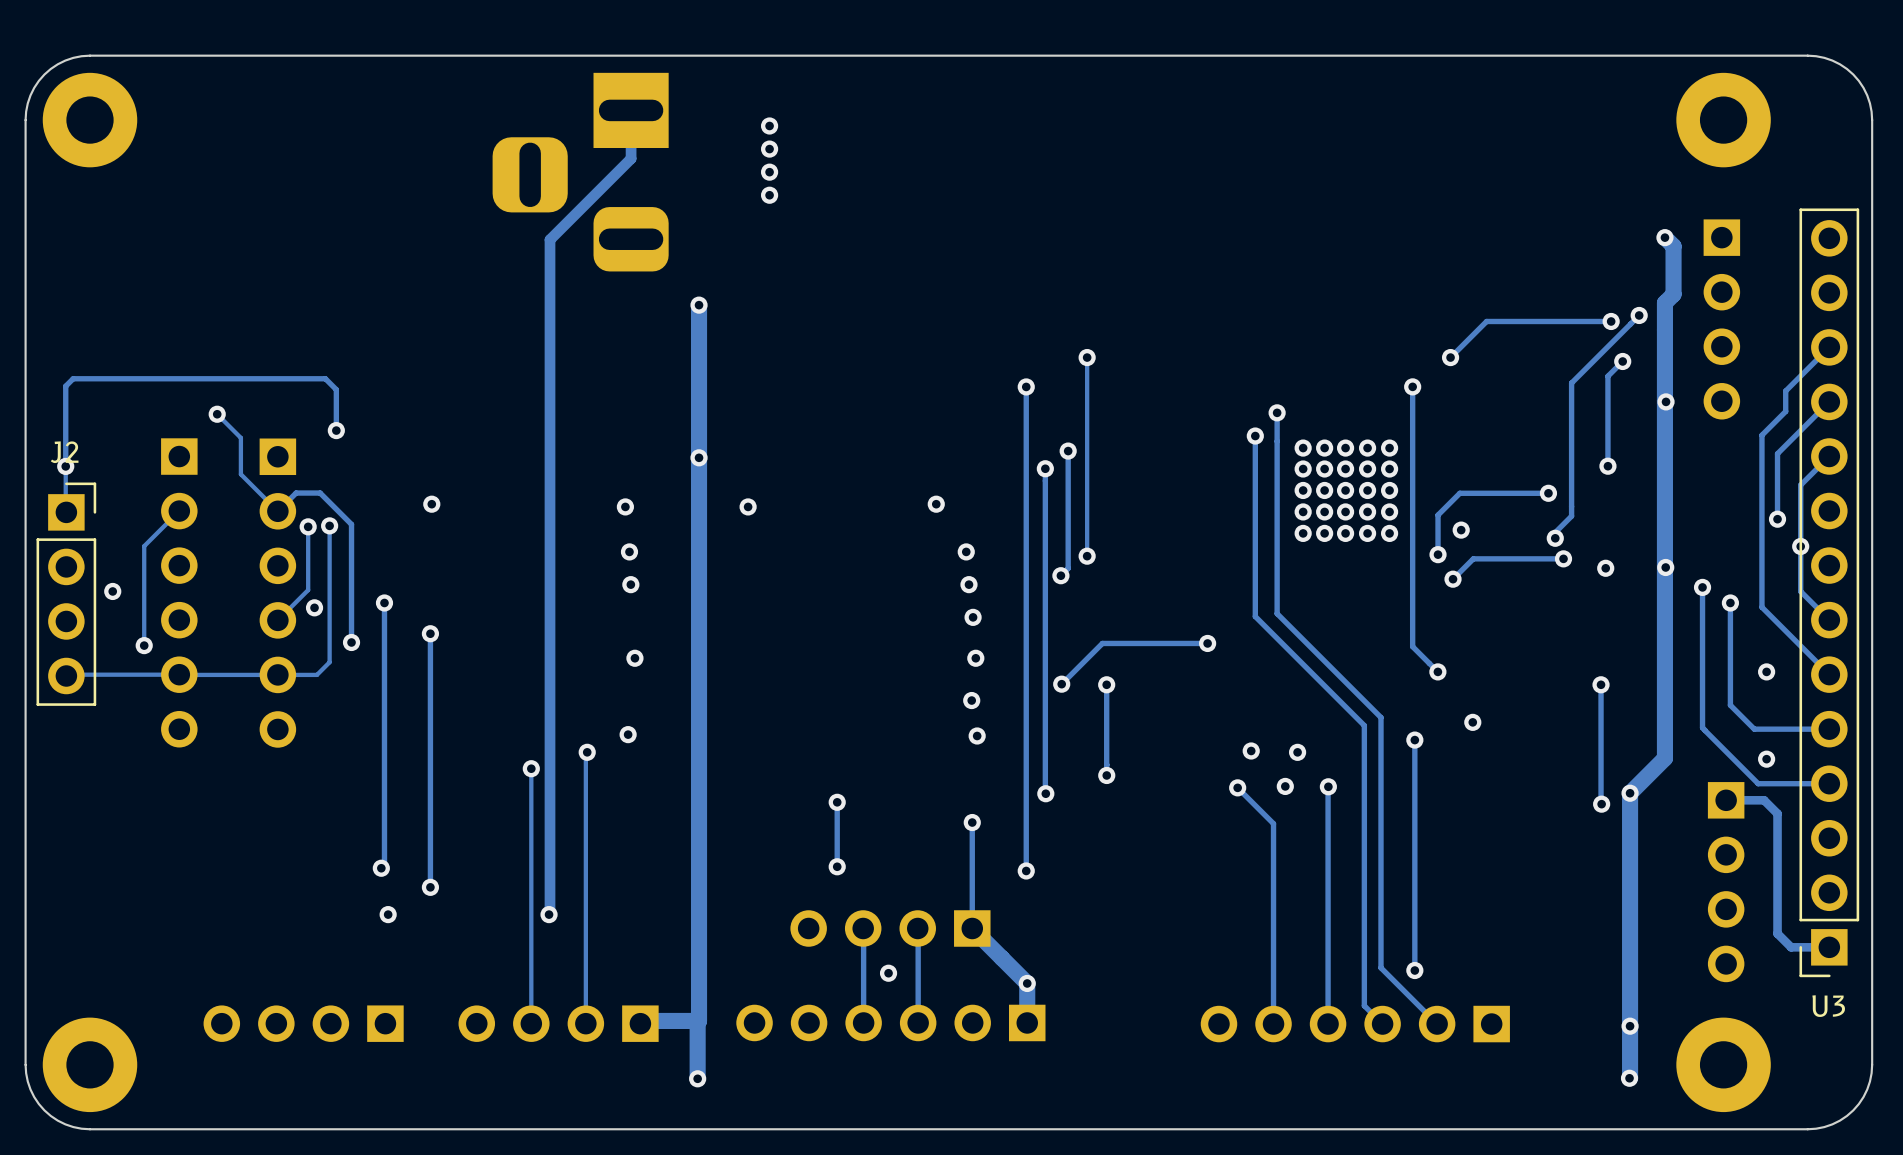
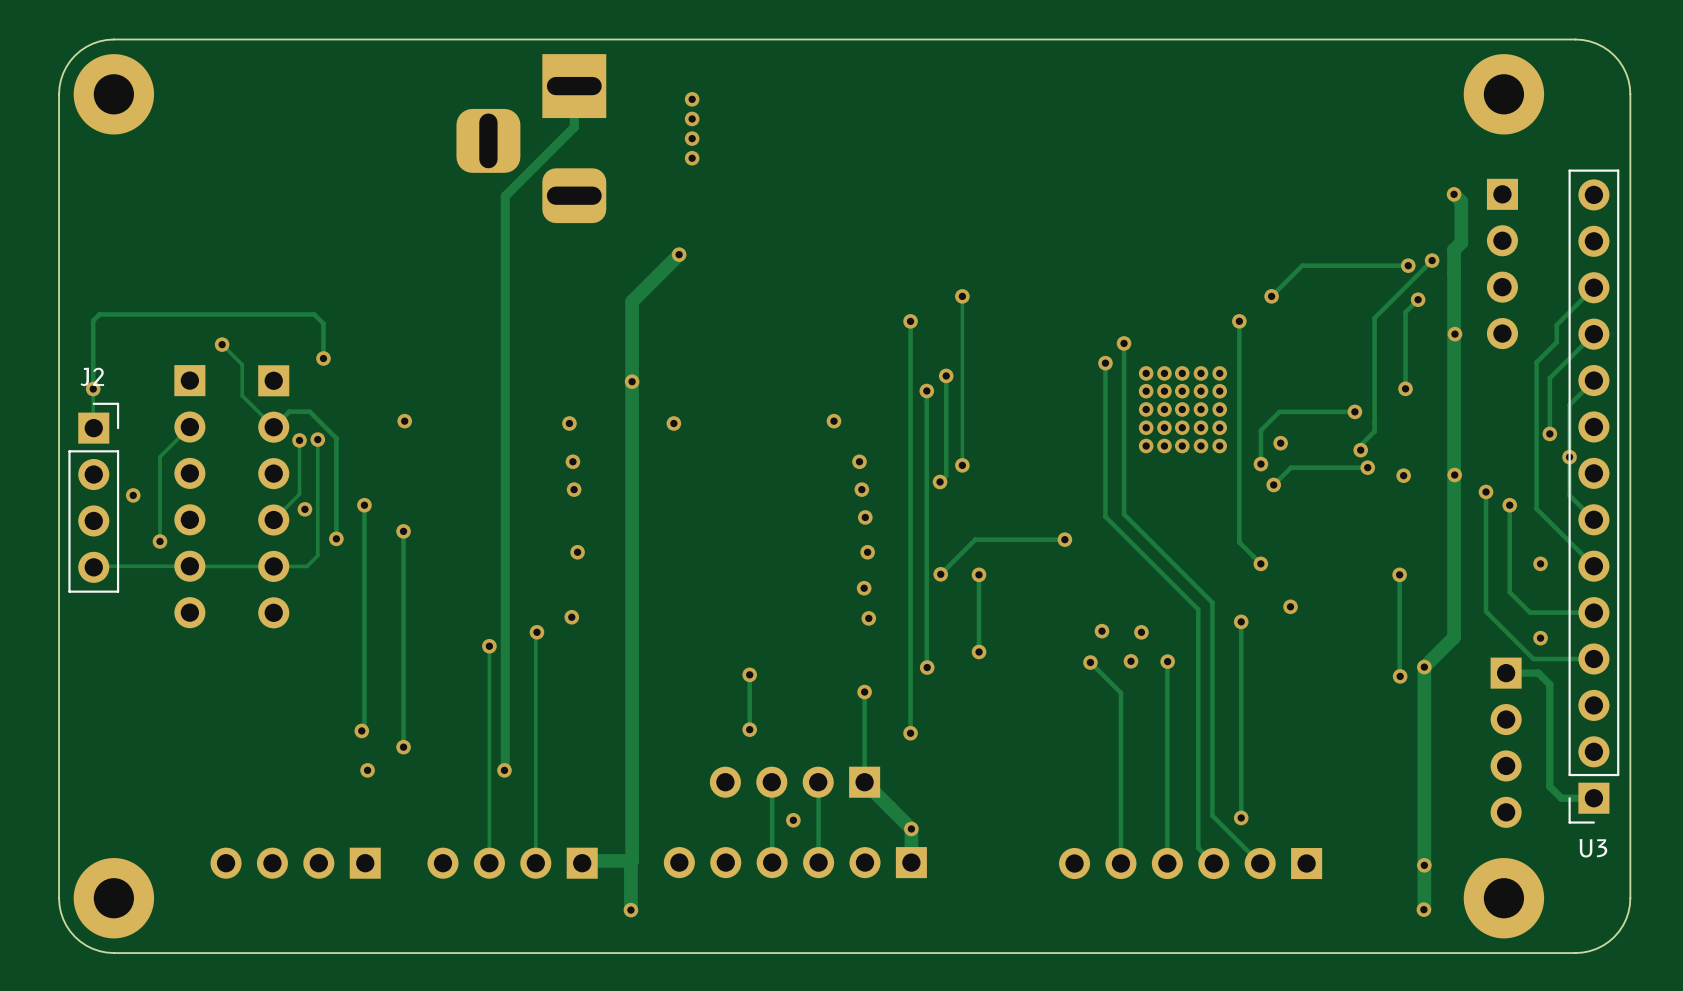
track: (699, 305) (699, 363) -> (679, 254) (632, 301)
via position: (699, 305) -> (679, 254)

